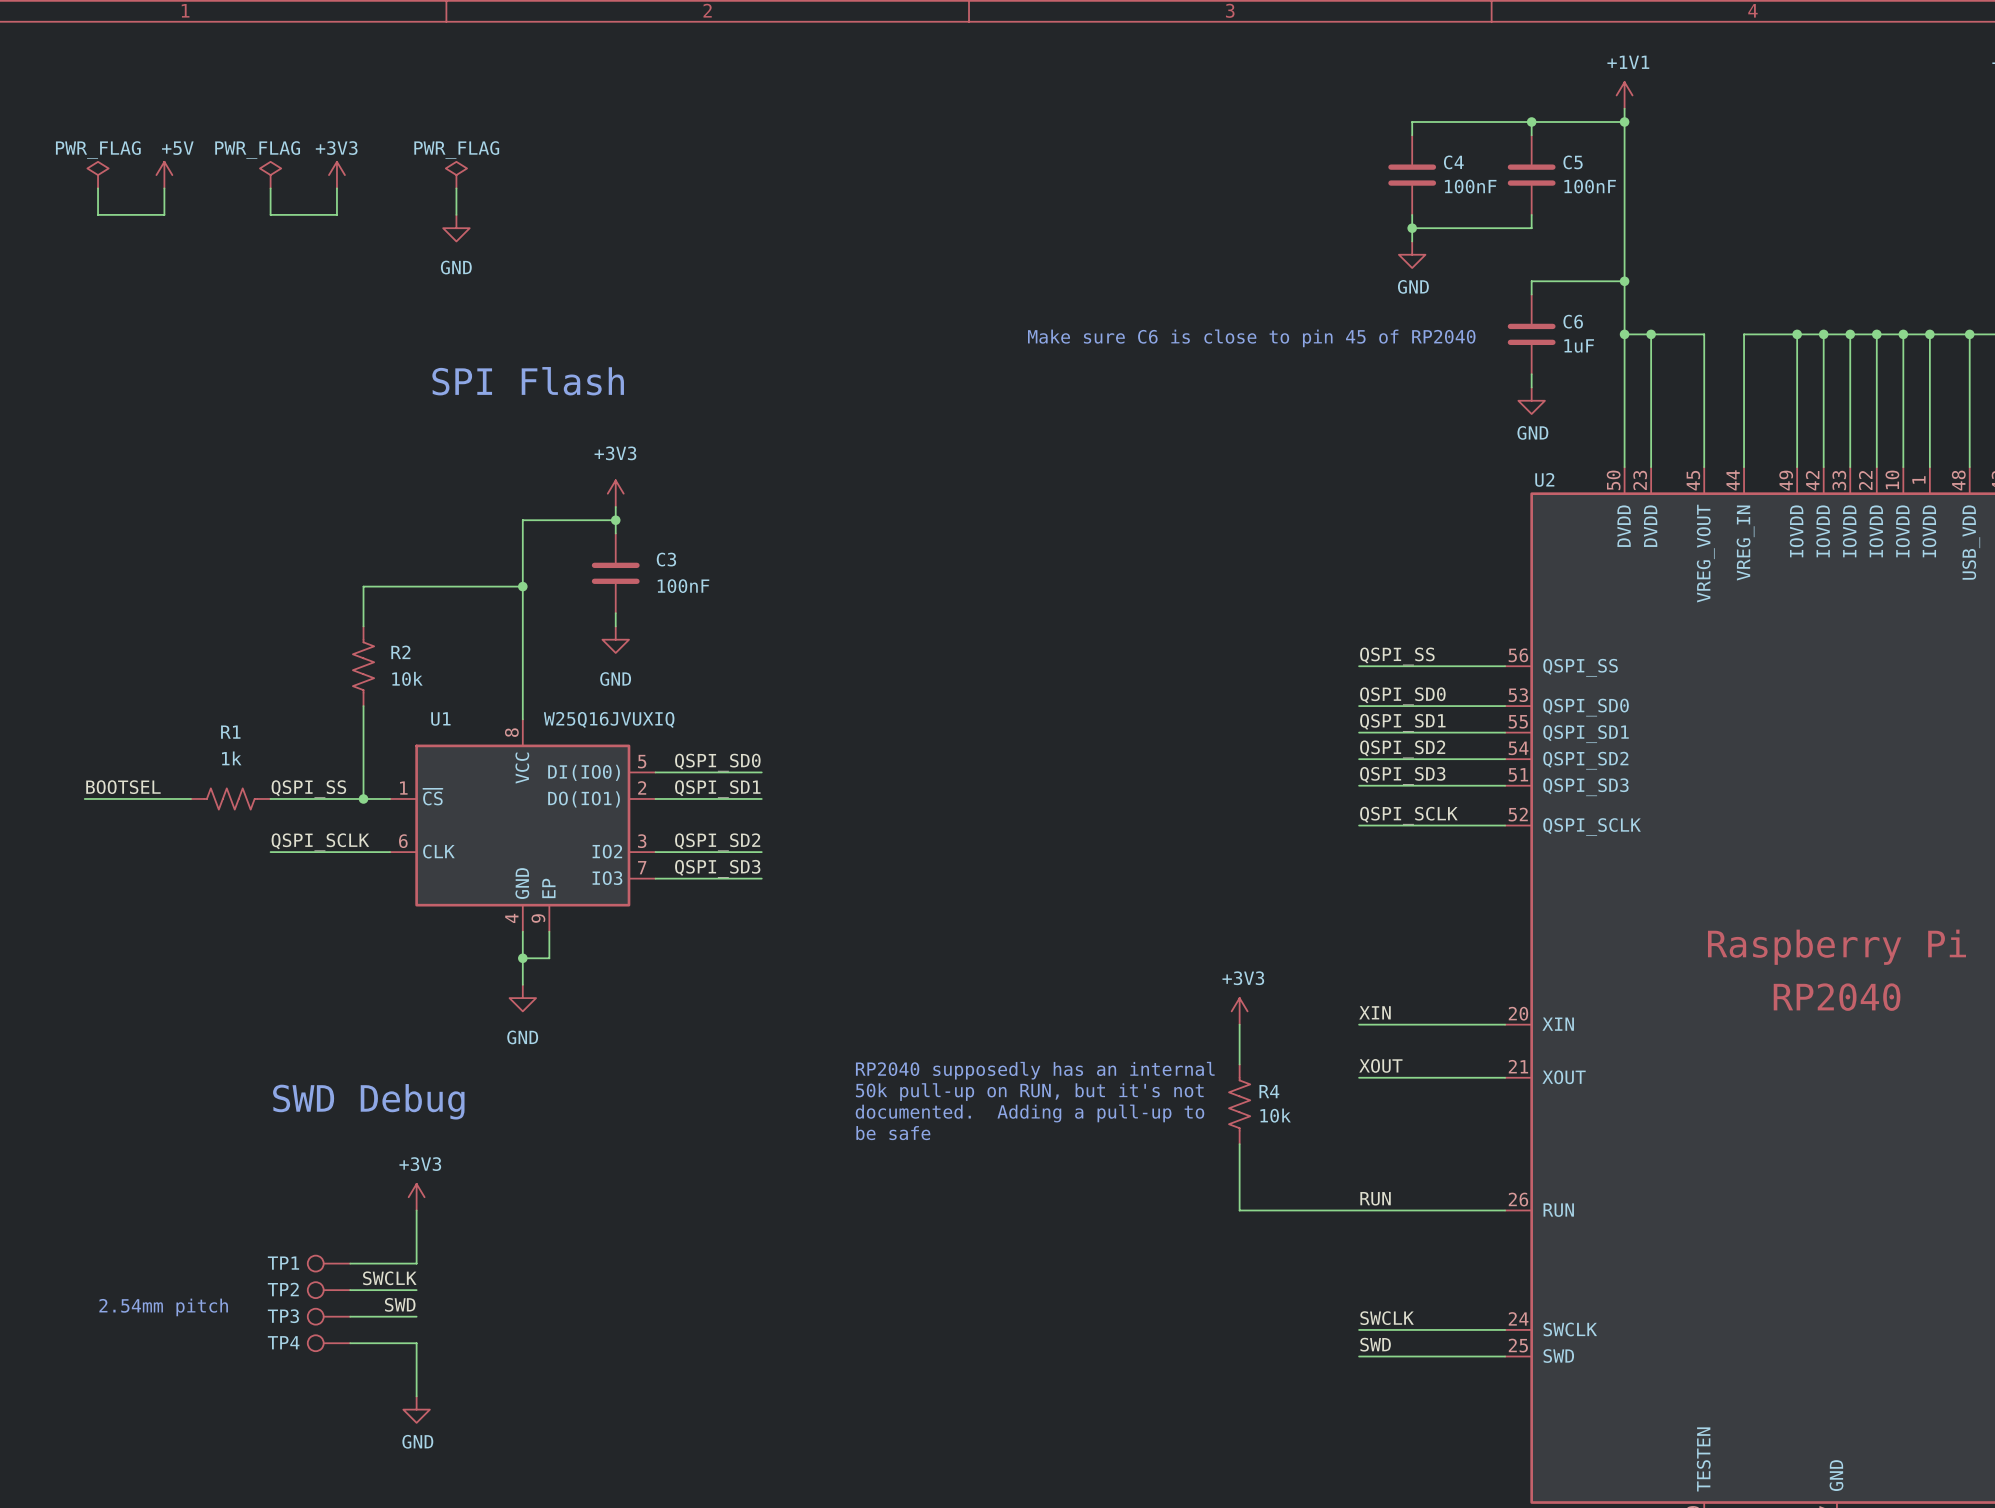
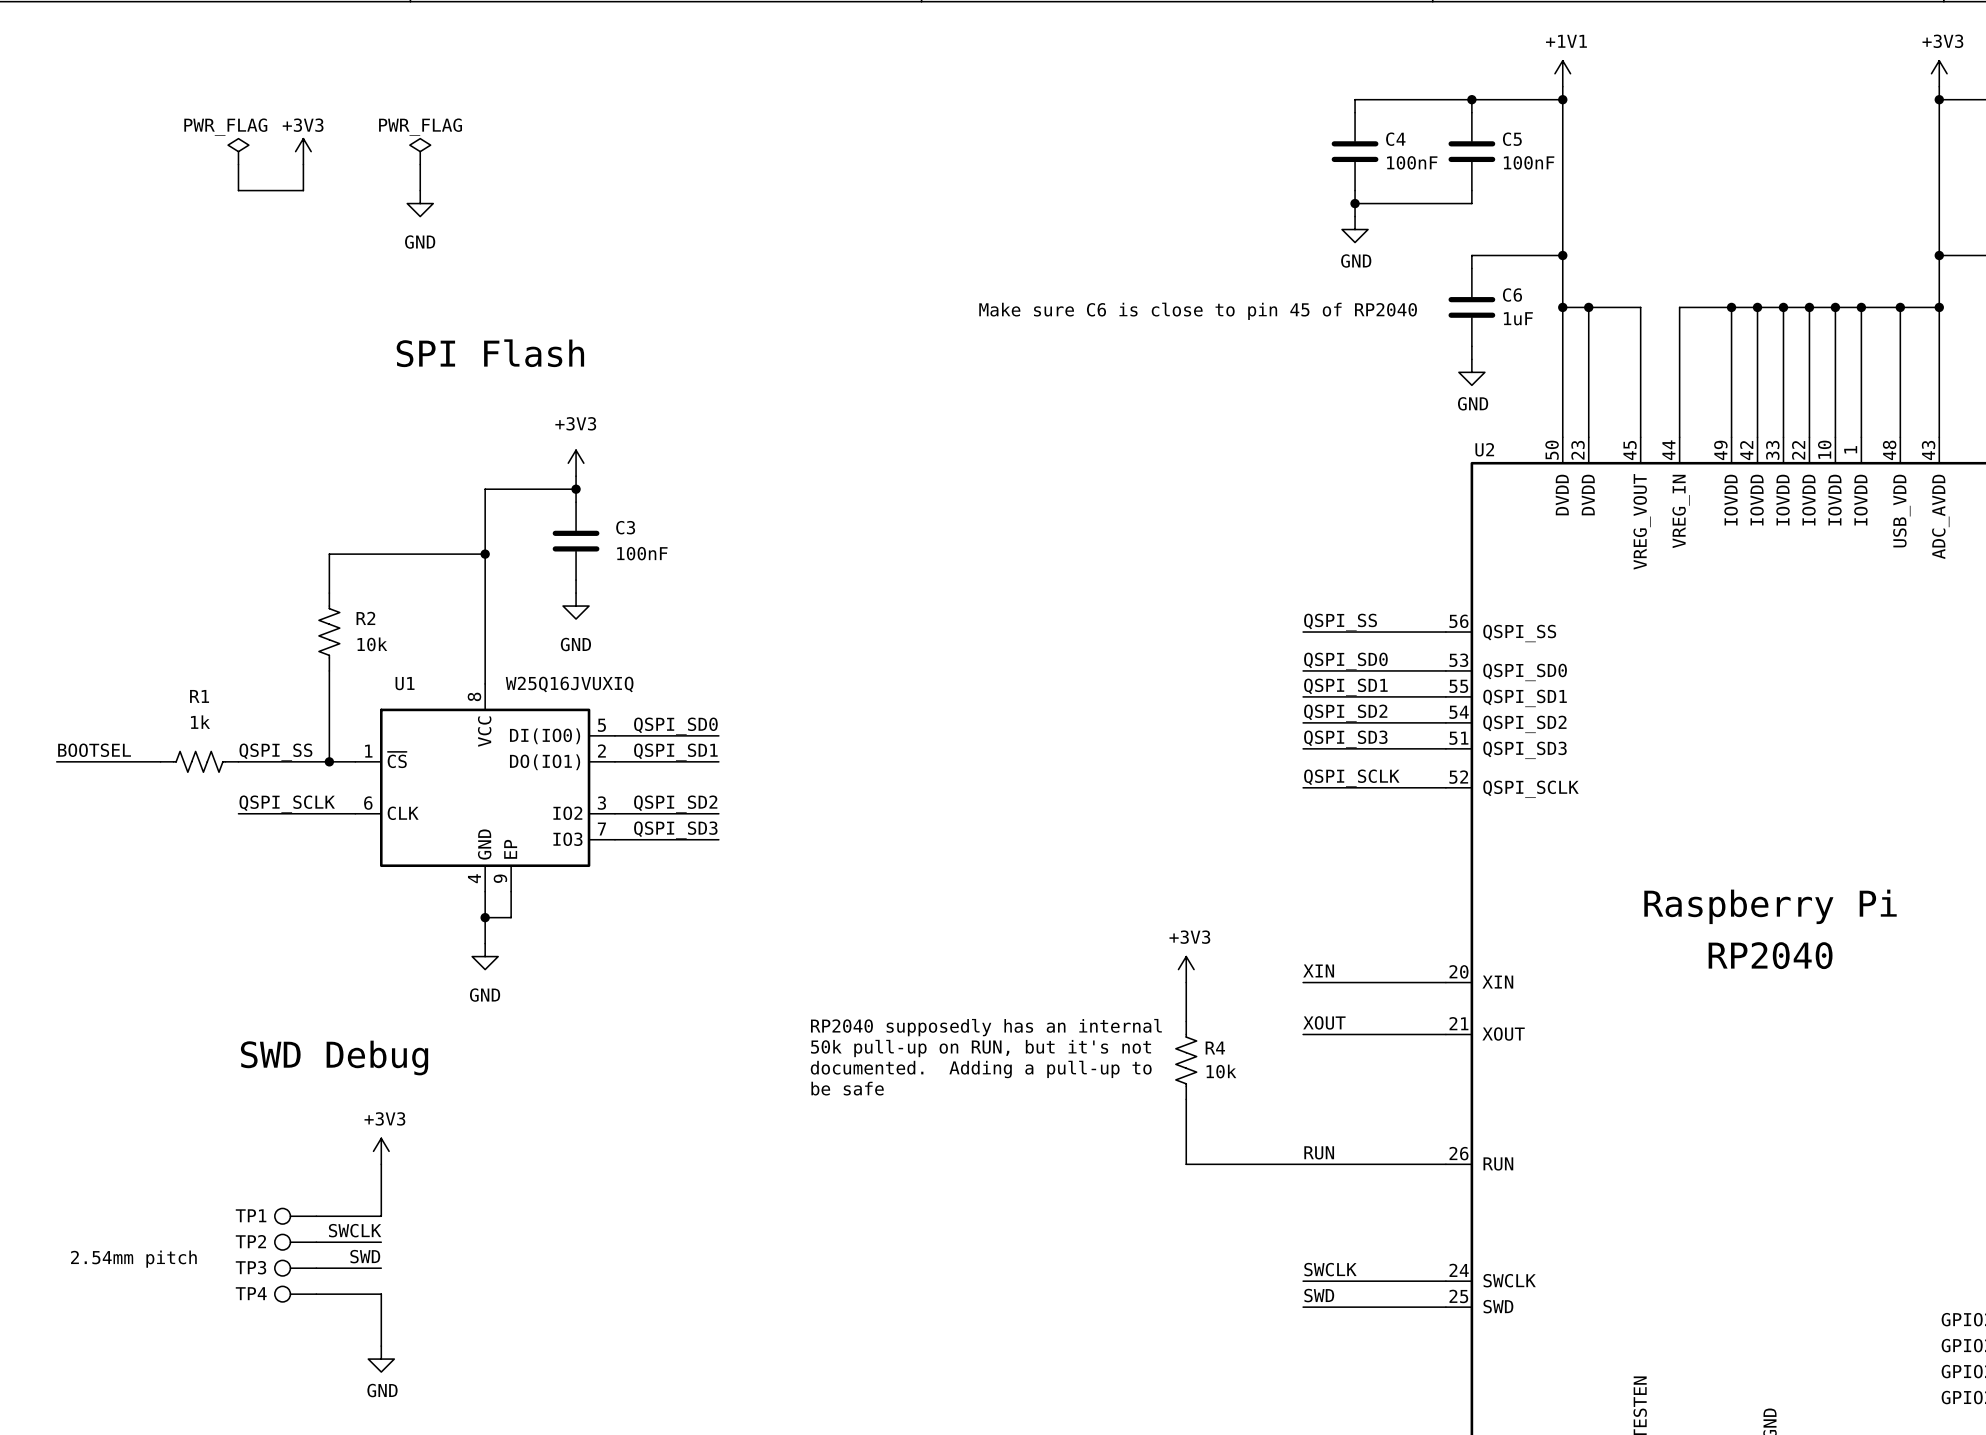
power symbol: PWR_FLAG (98, 175) -> none
power symbol: +5V (164, 175) -> none
wire: (98, 188) (98, 214) (164, 214) (164, 188) -> none

